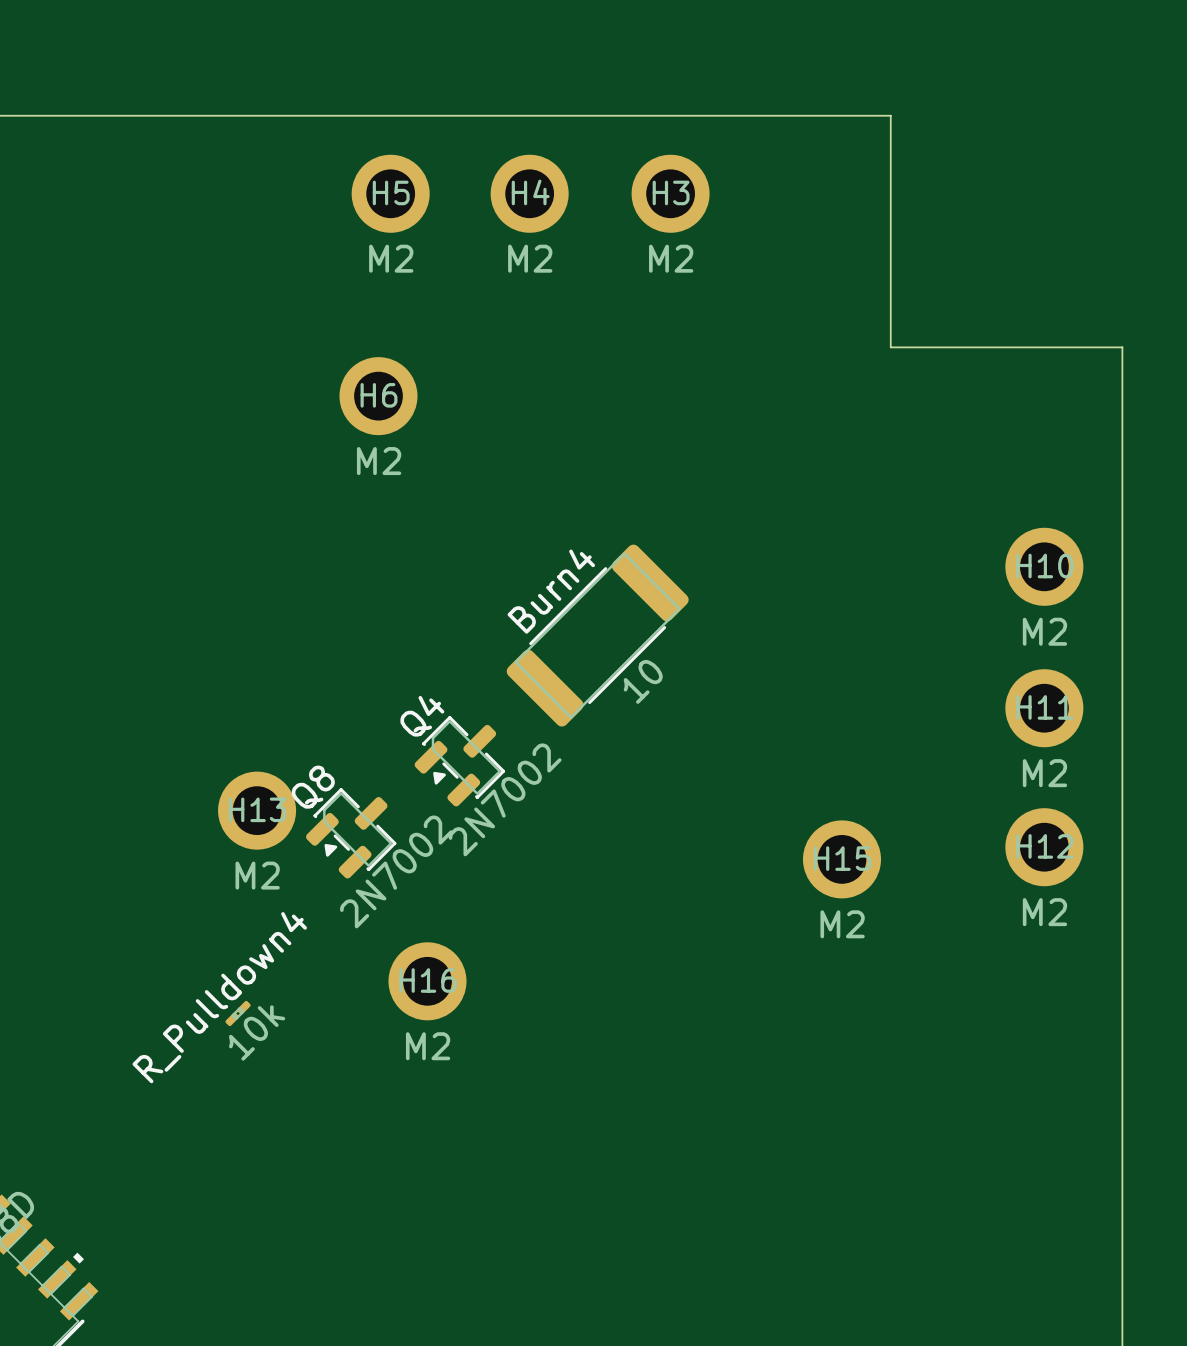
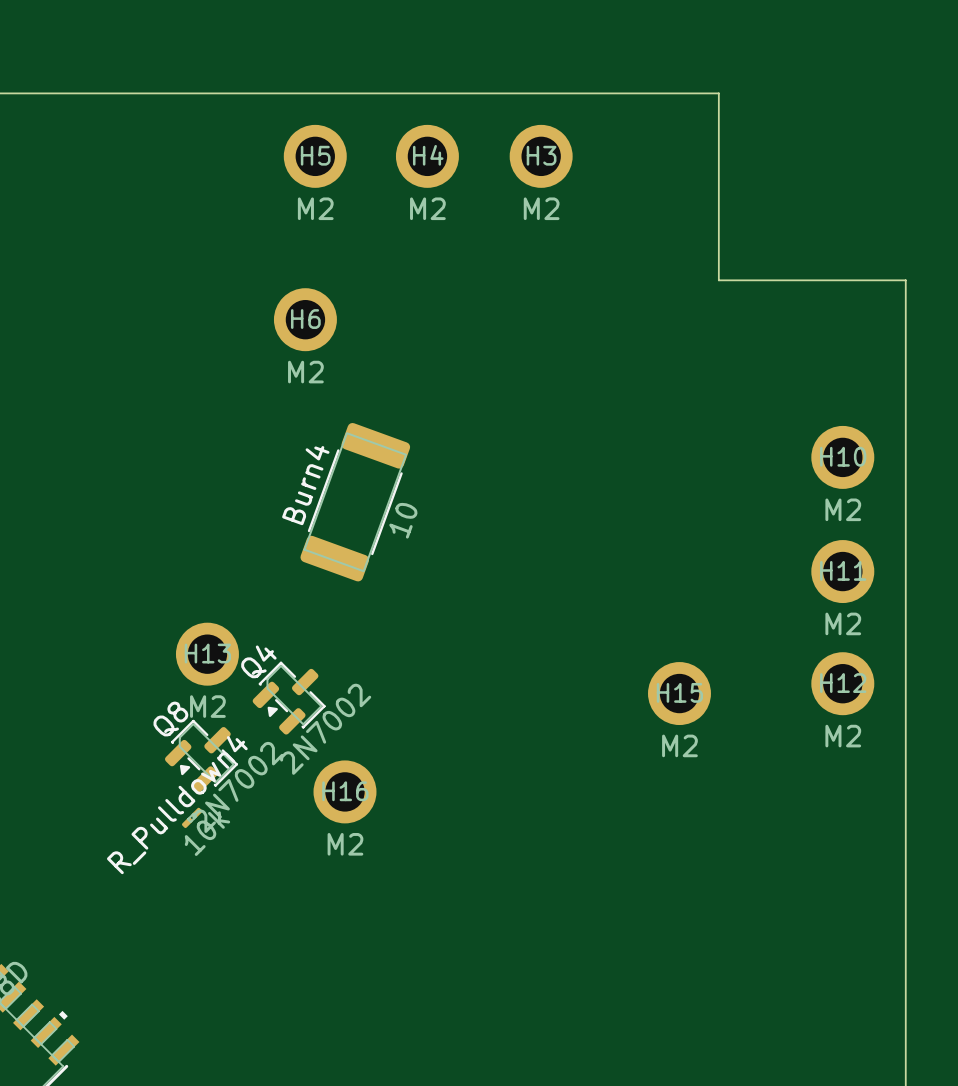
Burn4 rotation: 0° (597, 635) -> 25° counterclockwise (355, 502)
Burn4 position: (597, 635) -> (355, 502)
Q4 position: (459, 761) -> (289, 698)
Q8 position: (351, 833) -> (201, 756)

